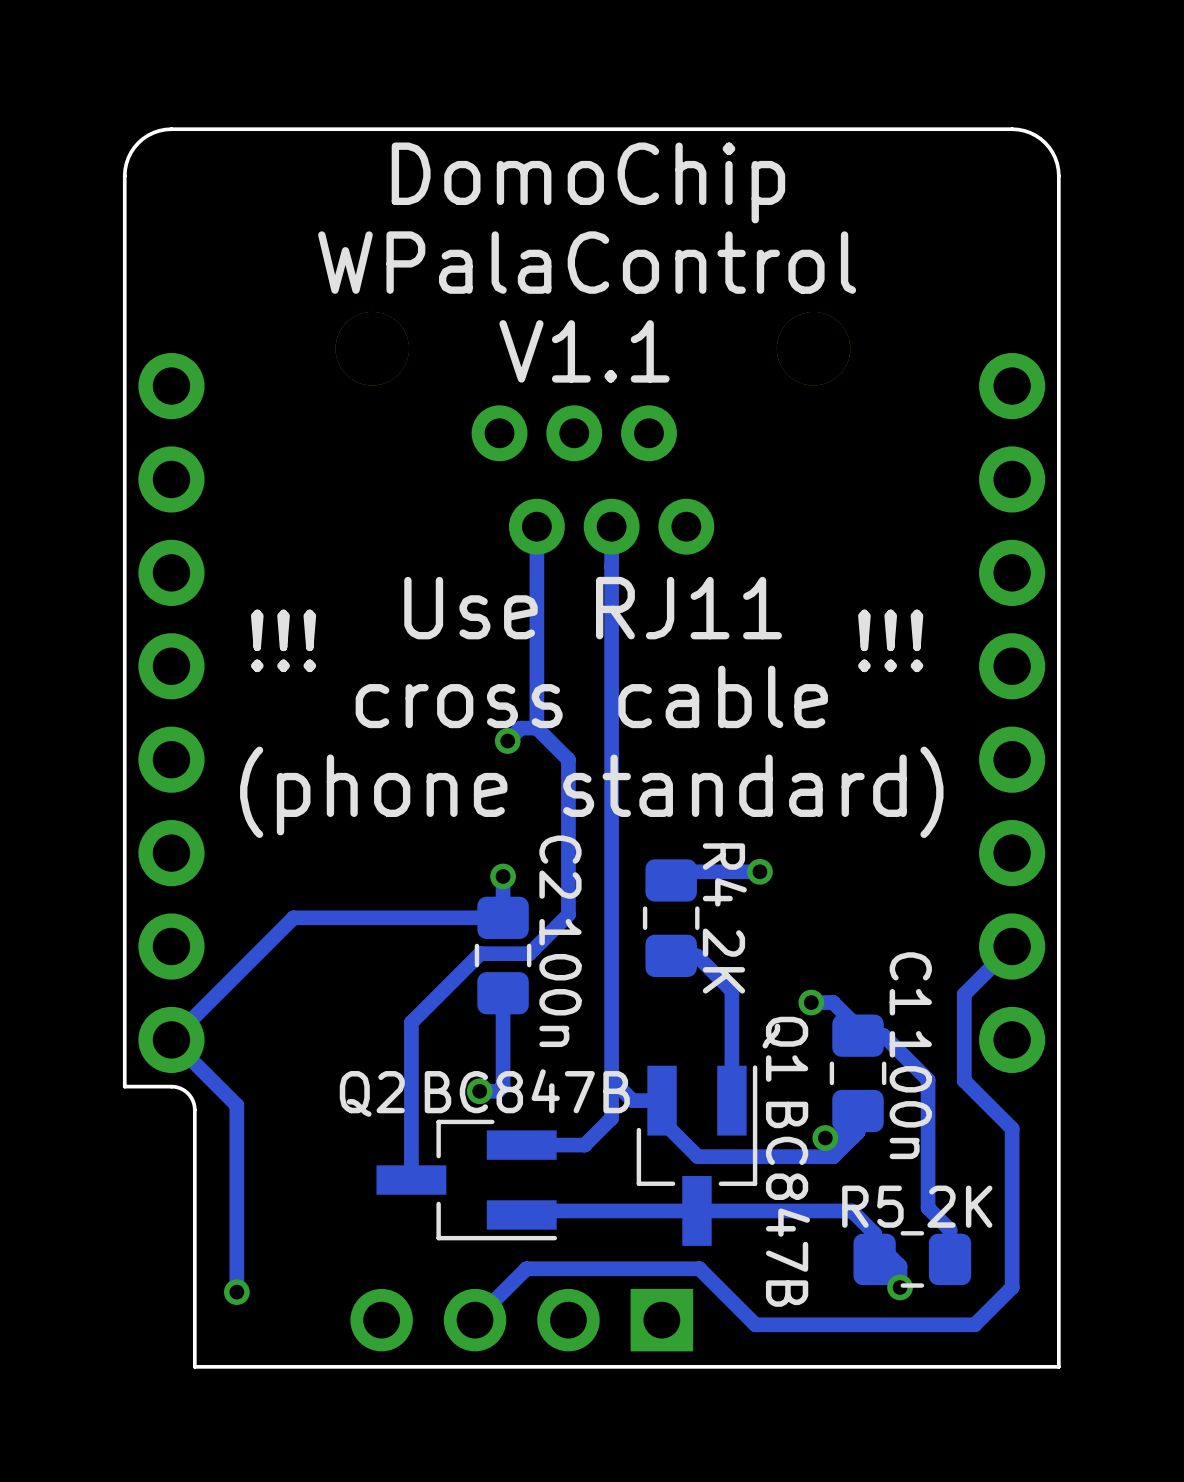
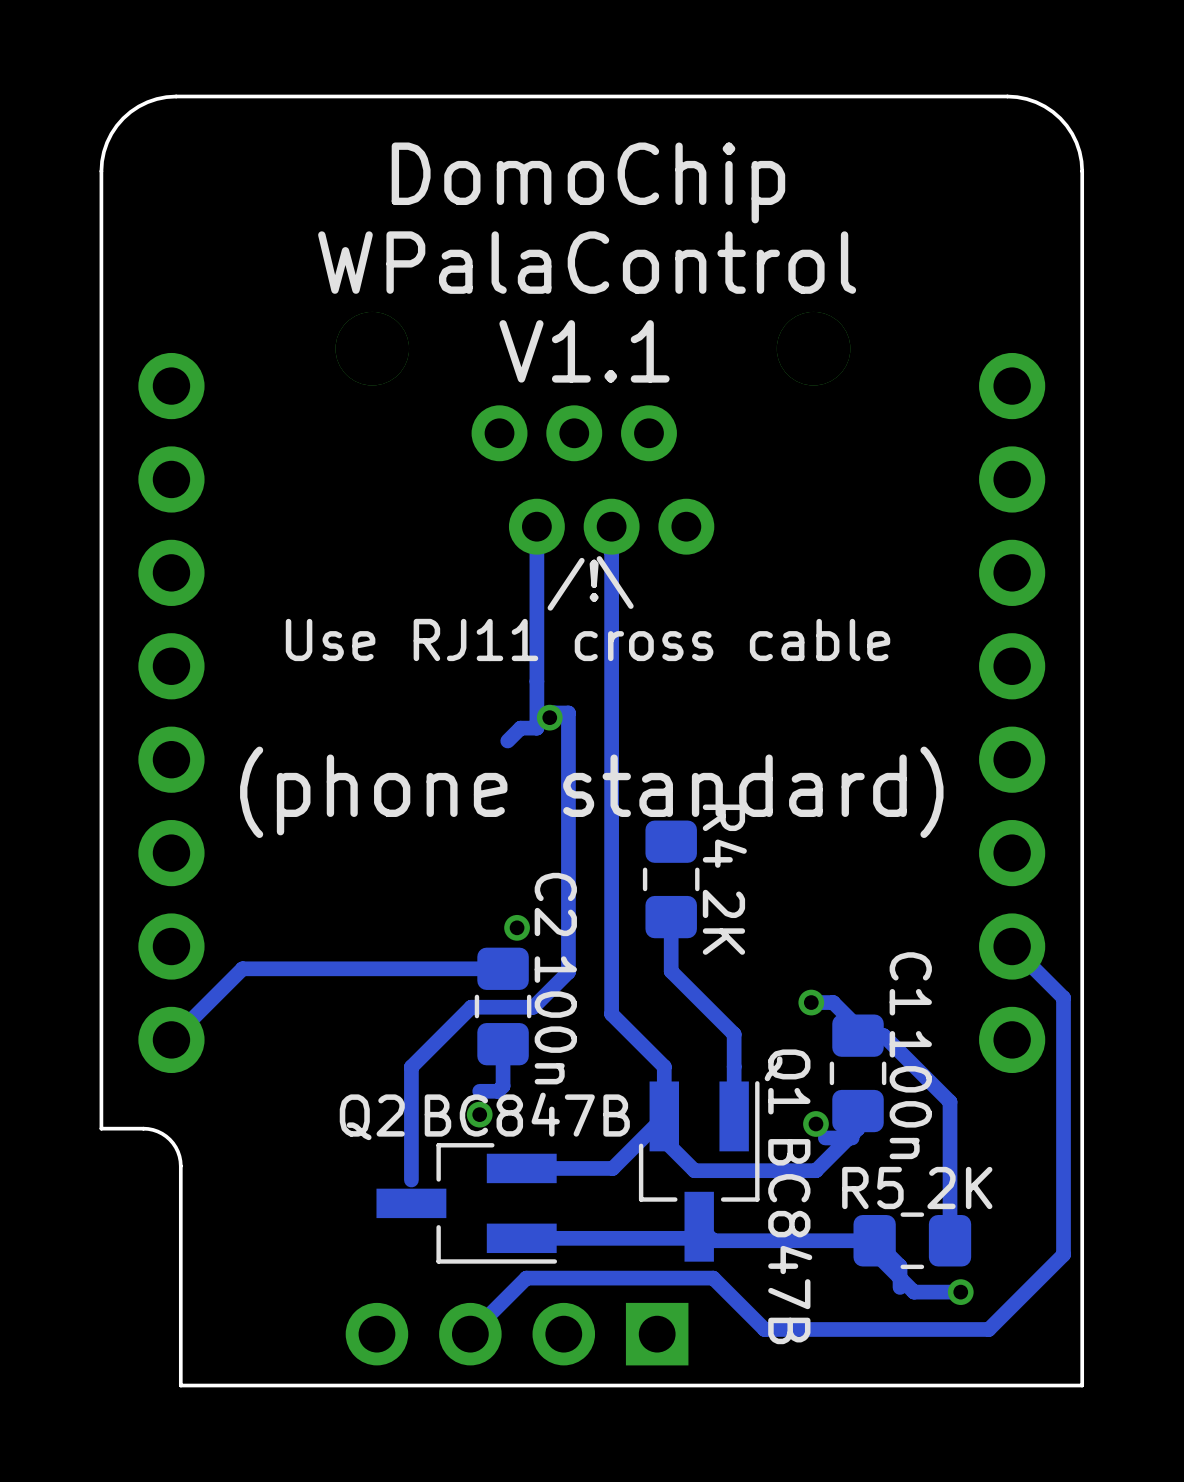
board edge: (171, 129) (153, 132) (138, 142) (128, 158) (124, 175) (124, 1086) (177, 1087) (187, 1093) (194, 1103) (194, 1366) (1058, 1366) (1058, 175) (1055, 158) (1049, 147) (1040, 138) (1030, 132) (1012, 129) (171, 129) -> (1007, 96) (1036, 102) (1060, 118) (1076, 142) (1082, 171) (1082, 1385) (180, 1385) (179, 1156) (173, 1143) (157, 1131) (143, 1128) (101, 1128) (101, 171) (103, 151) (111, 133) (123, 118) (138, 106) (156, 99) (176, 96) (1007, 96)
text: none -> /!\ (590, 583)
text: Use RJ11 (593, 608) -> none
text: !!! (283, 640) -> none
text: !!! (890, 640) -> none
text: cross cable (591, 696) -> Use RJ11 cross cable (588, 639)
track: (536, 728) (568, 759) -> (549, 717) (554, 712) (568, 712) (568, 759)
via position: (507, 741) -> (549, 717)
C2 name position: C2 (560, 867) -> C2 (555, 904)
track: (759, 871) (679, 871) (671, 880) -> none
via: (759, 871) -> none
track: (503, 876) (503, 917) (293, 917) (242, 968) -> (503, 968) (242, 968)
via position: (503, 876) -> (517, 927)
track: (568, 914) (529, 953) (480, 953) (411, 1022) (411, 1067) -> (568, 914) (568, 972) (533, 1007) (471, 1007) (411, 1067)
R4 position: (671, 918) -> (671, 879)
track: none -> (671, 929) (671, 971) (734, 1034) (734, 1116)
track: (1012, 946) (964, 994) (964, 1080) (1012, 1128) (1012, 1287) (974, 1324) (755, 1324) (699, 1268) (526, 1268) (475, 1320) -> (1012, 946) (1063, 997) (1063, 1254) (988, 1329) (764, 1329) (713, 1278) (526, 1278) (470, 1334)
C2 position: (503, 955) -> (503, 1006)
track: (671, 955) (696, 955) (731, 990) (731, 1100) -> none
C2 value position: 100n (560, 982) -> 100n (555, 1020)
track: (503, 993) (503, 1052) -> none
track: (611, 1014) (611, 1118) (584, 1145) (521, 1145) -> none
track: (171, 1039) (236, 1105) (236, 1292) -> none
Q1 name position: Q1 (785, 1049) -> Q1 (787, 1081)
track: (611, 1079) (632, 1100) (662, 1100) (662, 1120) (697, 1156) (833, 1156) (858, 1132) (858, 1128) -> (611, 1014) (664, 1066) (664, 1140) (694, 1170) (815, 1170) (858, 1128)
track: (928, 1079) (928, 1208) (950, 1230) -> (928, 1079) (950, 1101) (950, 1230)
via position: (479, 1091) -> (479, 1114)
track: none -> (664, 1116) (612, 1168) (521, 1168)
via position: (825, 1137) -> (815, 1123)
Q1 position: (696, 1155) -> (699, 1171)
Q2 position: (466, 1180) -> (466, 1203)
Q1 value position: BC847B (787, 1204) -> BC847B (790, 1241)
track: (521, 1214) (525, 1210) (851, 1210) (874, 1233) (874, 1259) -> none
track: none -> (521, 1238) (687, 1238) (699, 1226) (713, 1240) (862, 1240) (914, 1292) (960, 1292)
R5 position: (912, 1259) -> (912, 1240)
via position: (900, 1287) -> (960, 1292)
via: (236, 1292) -> none
part position: (521, 1320) -> (517, 1334)

